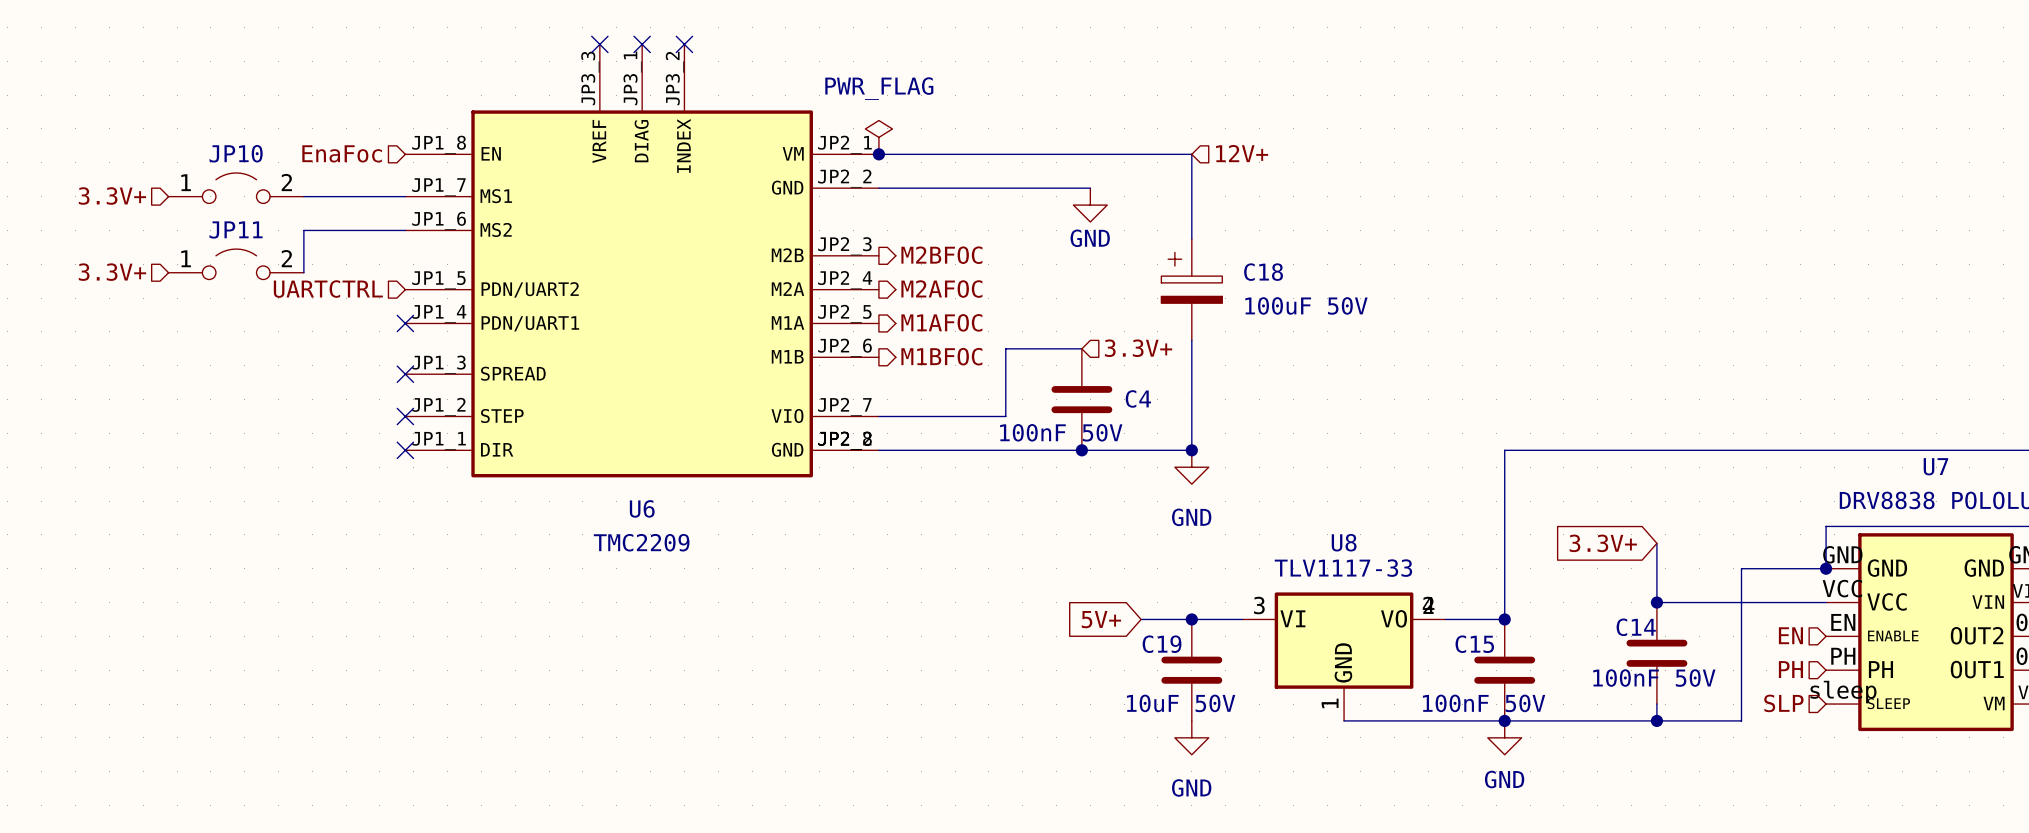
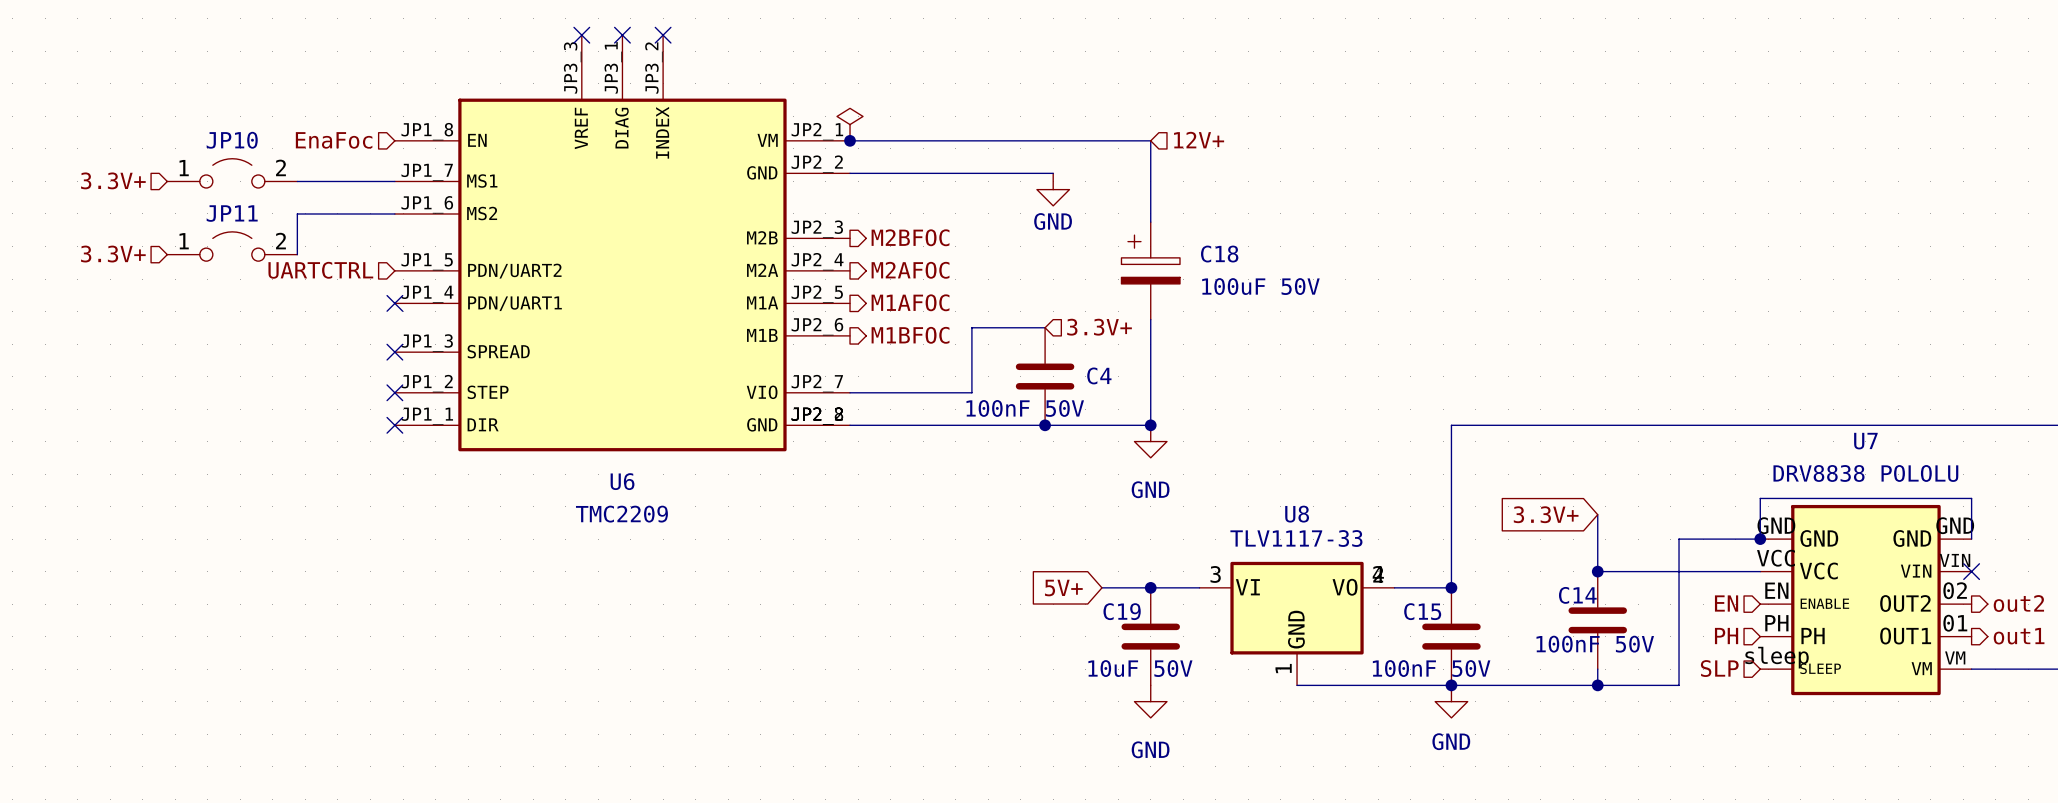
power symbol text: PWR_FLAG (879, 88) -> none

